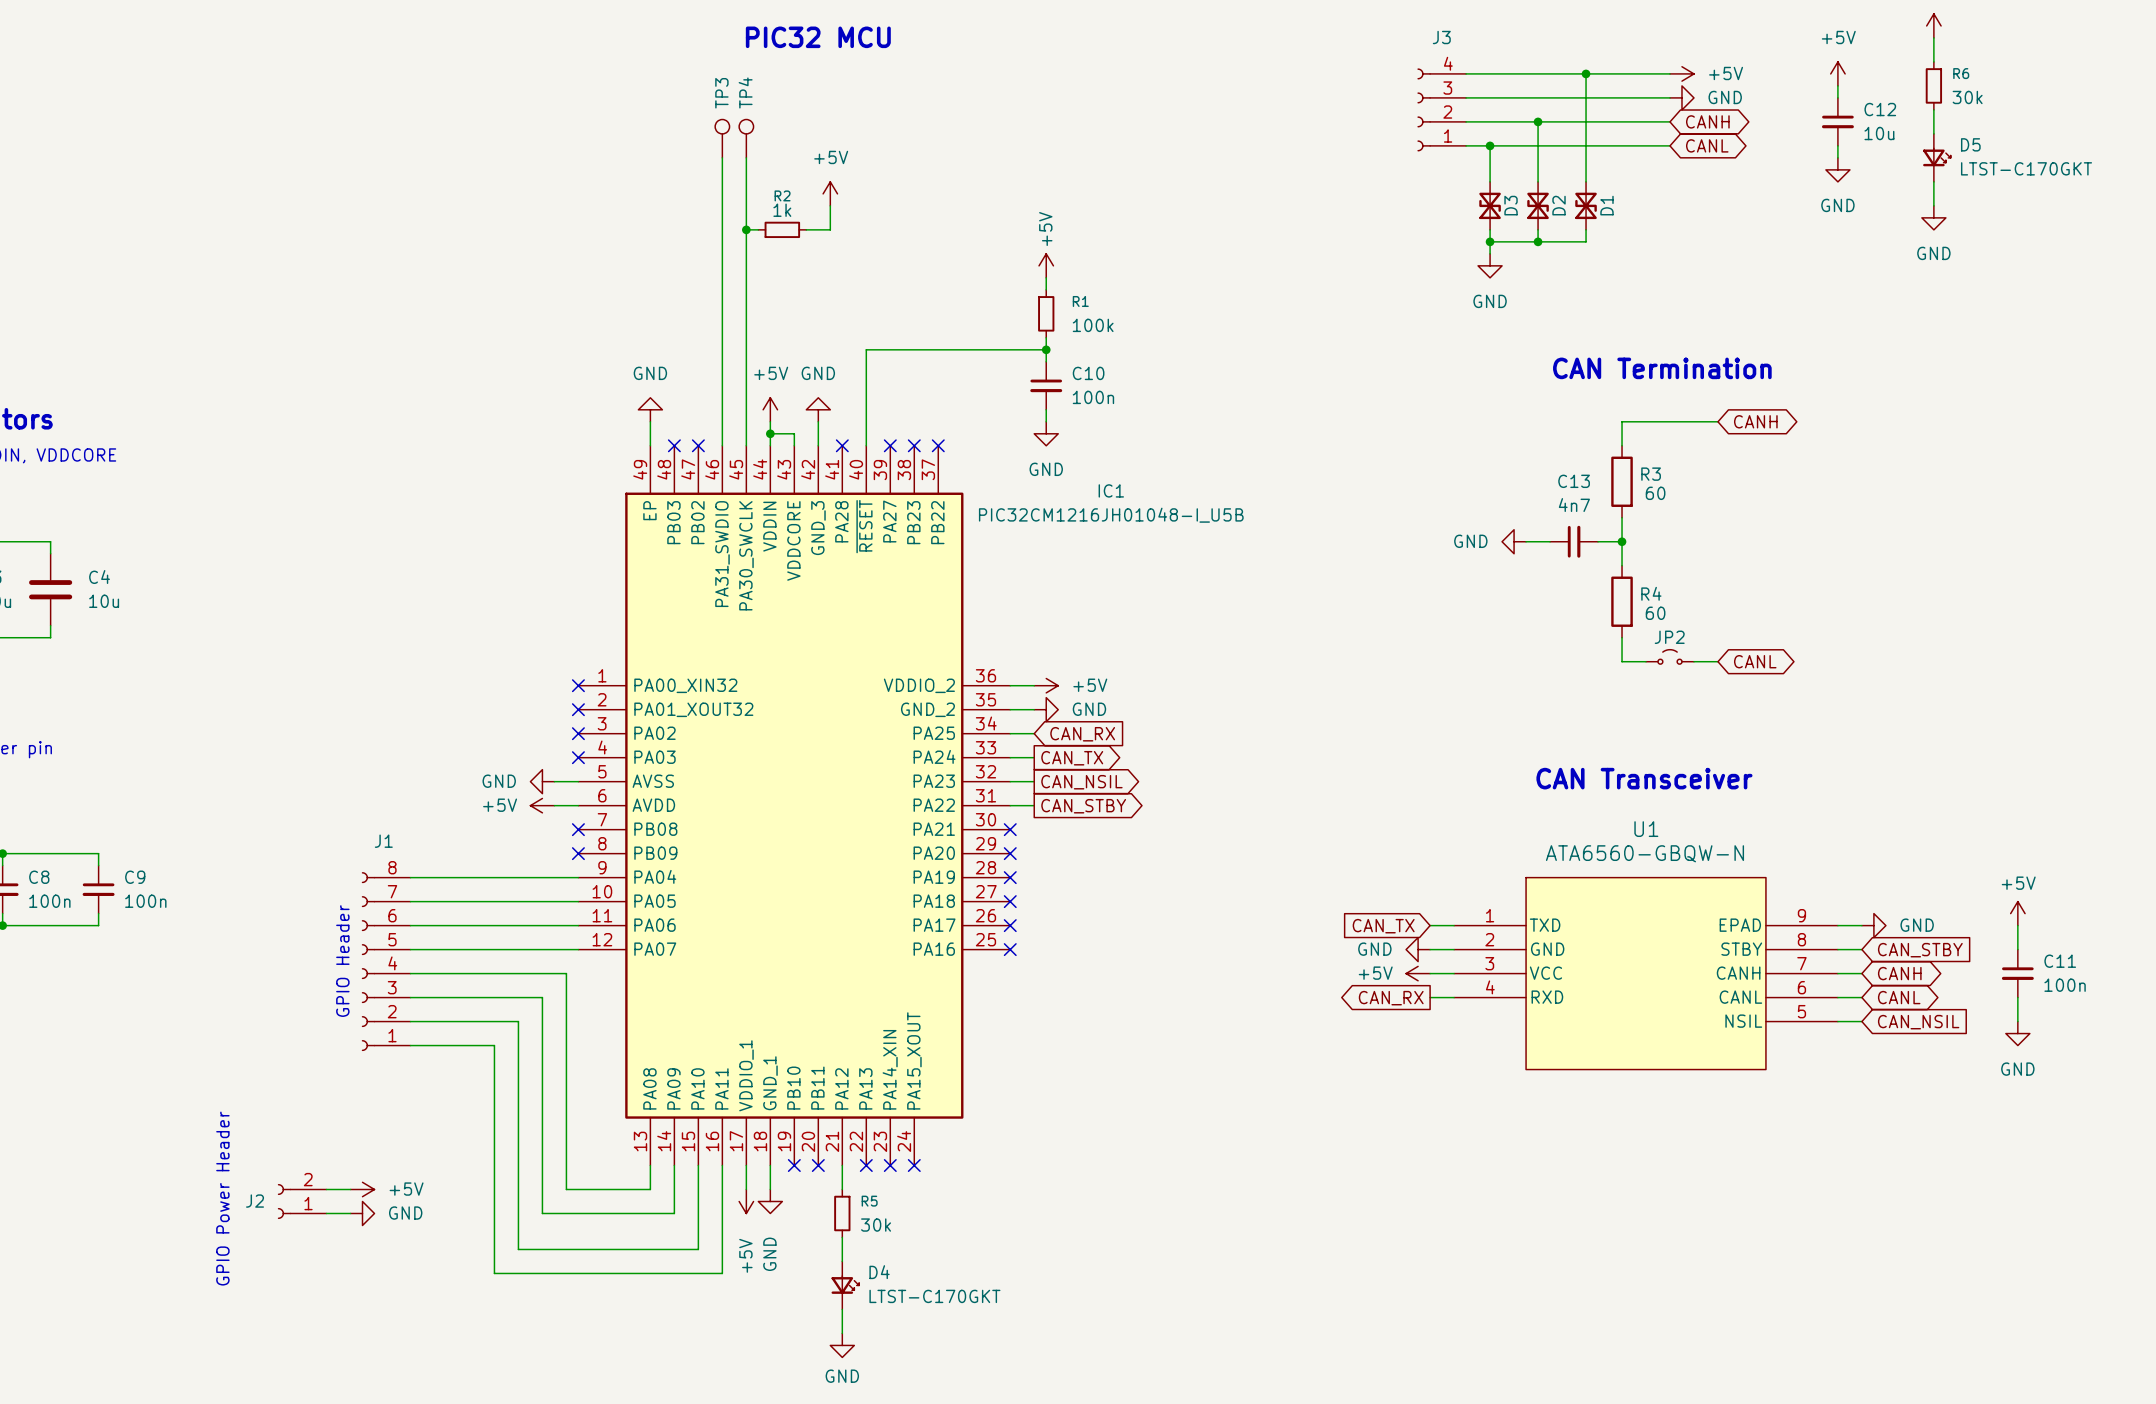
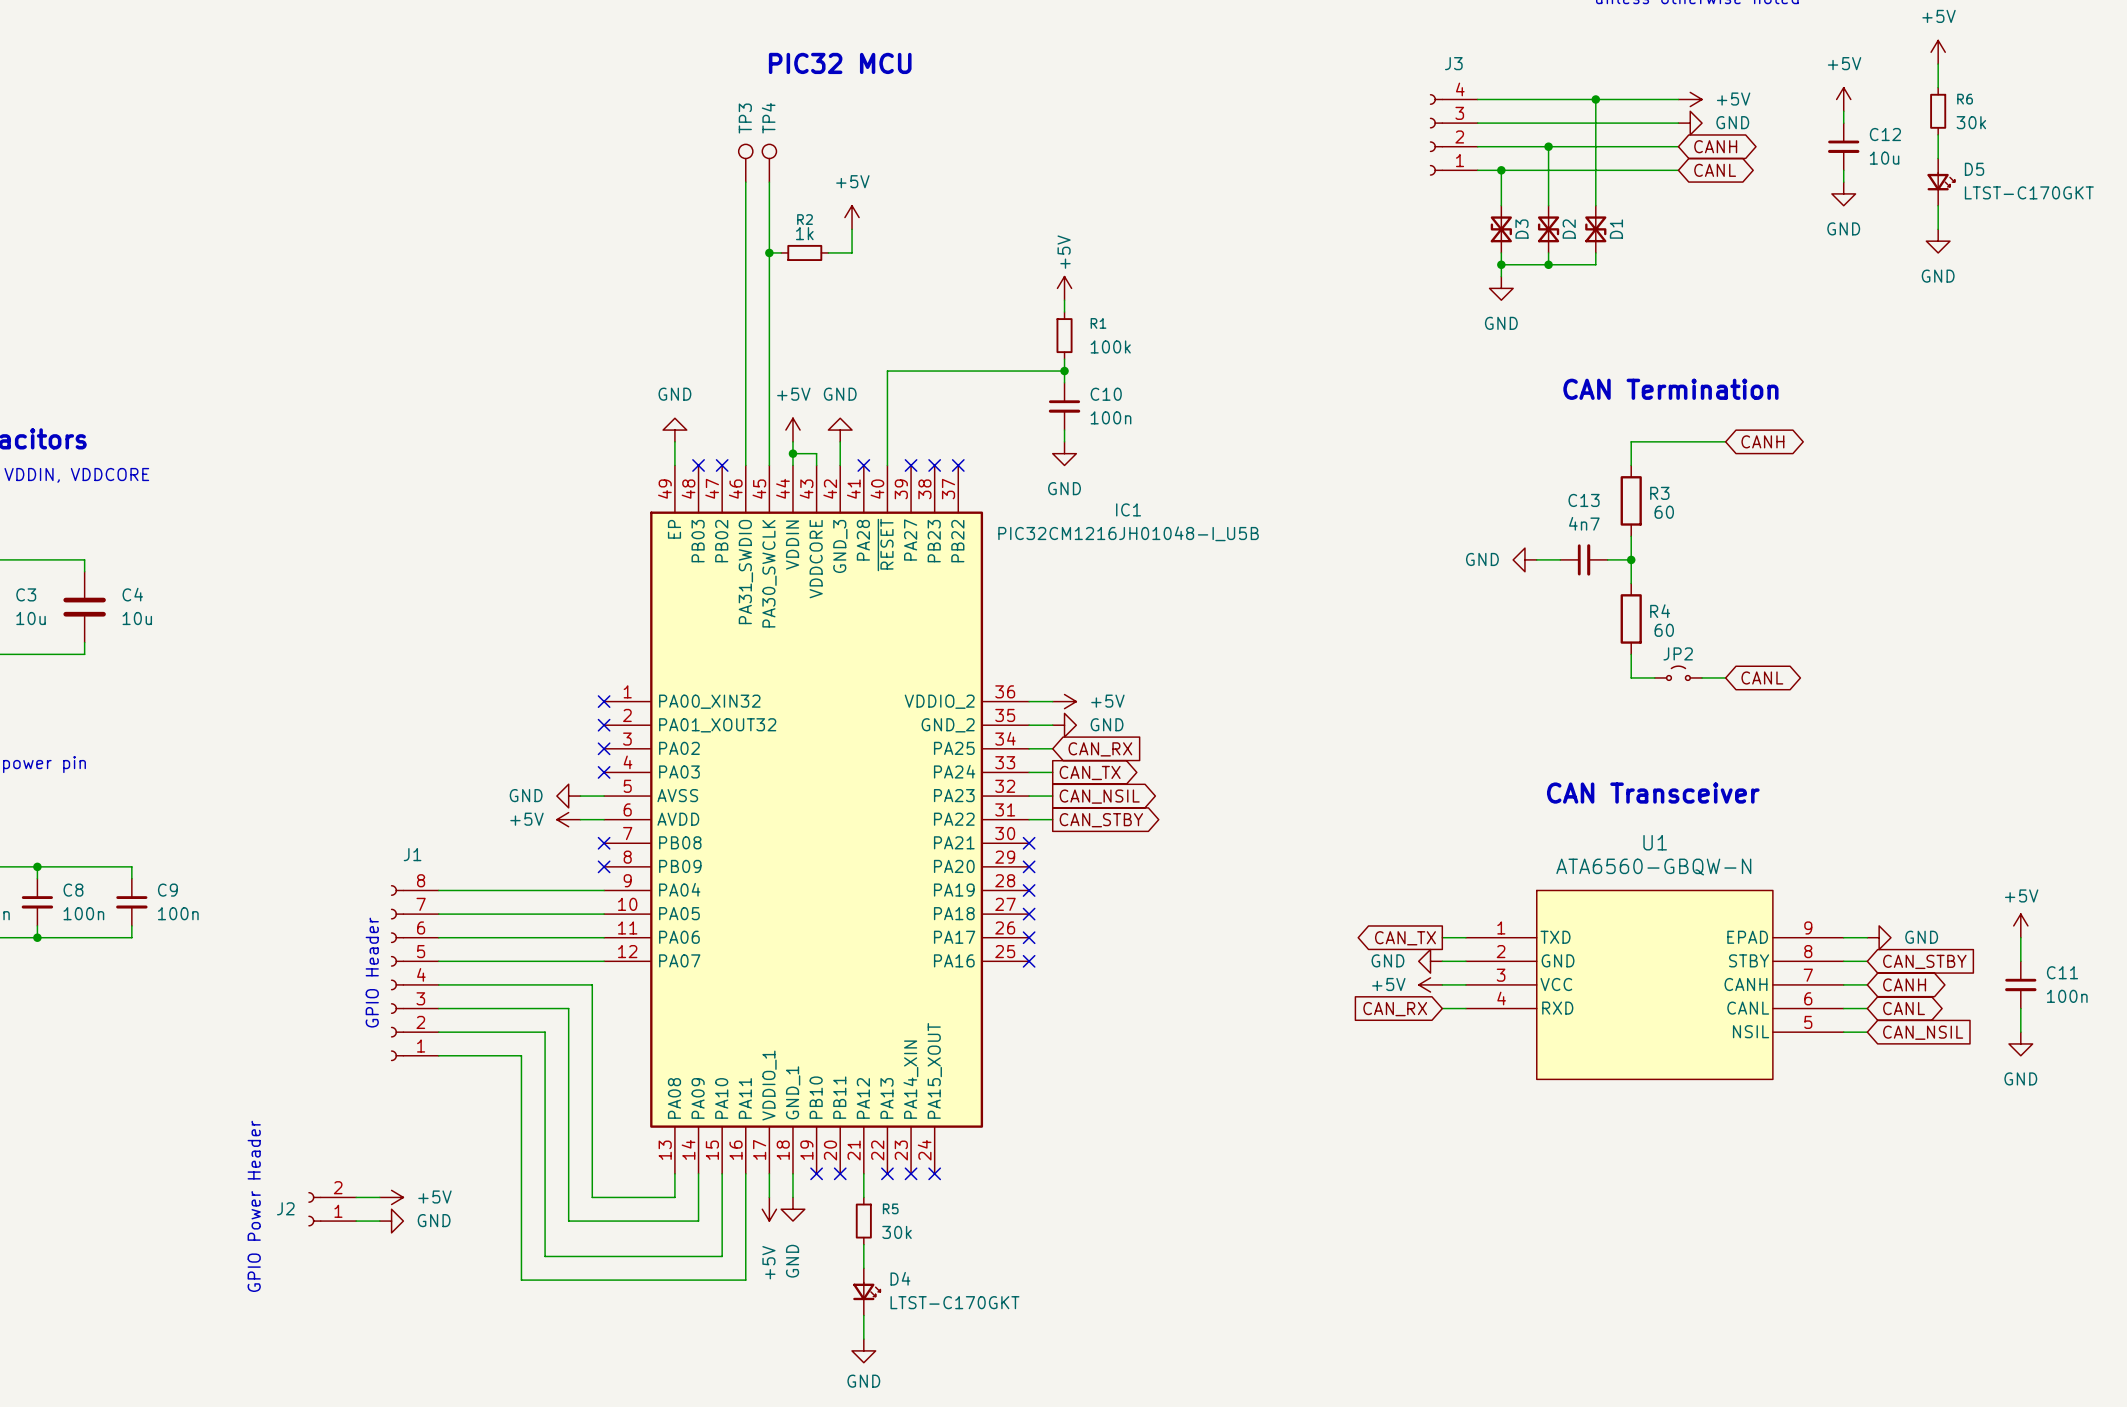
global label shape: input (1383, 926) -> output (1405, 938)
global label shape: output (1391, 998) -> input (1395, 1009)

